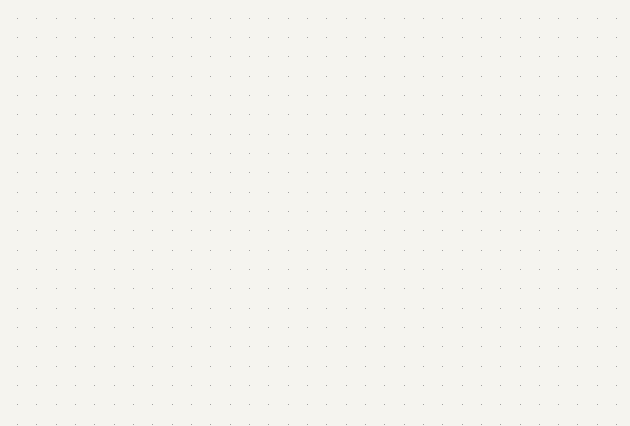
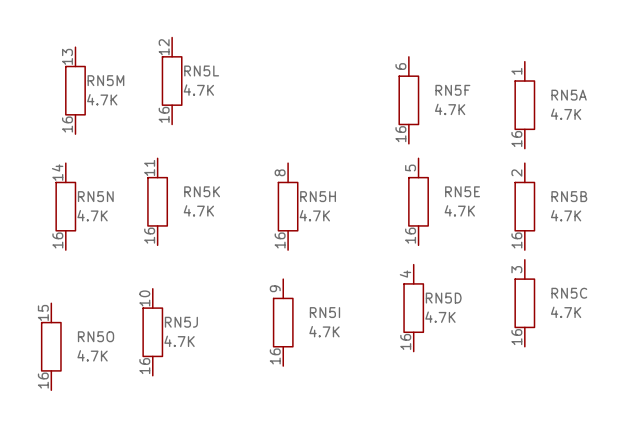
RN5L: none -> 4.7K (172, 81)
RN5M: none -> 4.7K (75, 90)
RN5F: none -> 4.7K (408, 100)
RN5A: none -> 4.7K (524, 105)
RN5K: none -> 4.7K (157, 201)
RN5E: none -> 4.7K (418, 201)
RN5N: none -> 4.7K (65, 206)
RN5H: none -> 4.7K (288, 206)
RN5B: none -> 4.7K (524, 206)
RN5C: none -> 4.7K (524, 303)
RN5D: none -> 4.7K (413, 308)
RN5I: none -> 4.7K (283, 322)
RN5J: none -> 4.7K (152, 332)
RN5O: none -> 4.7K (51, 346)

